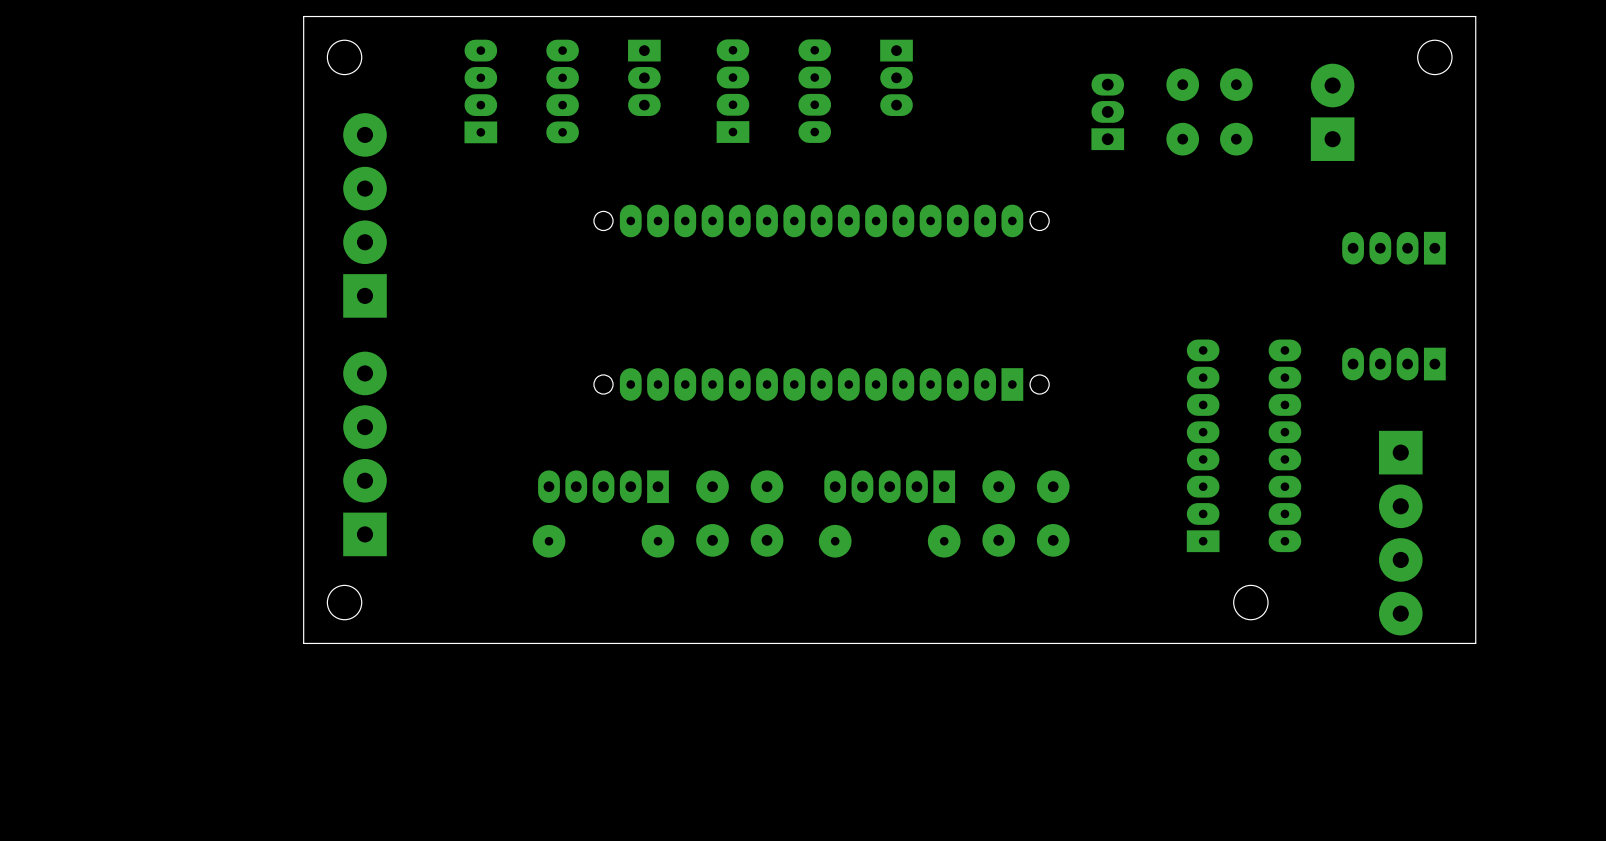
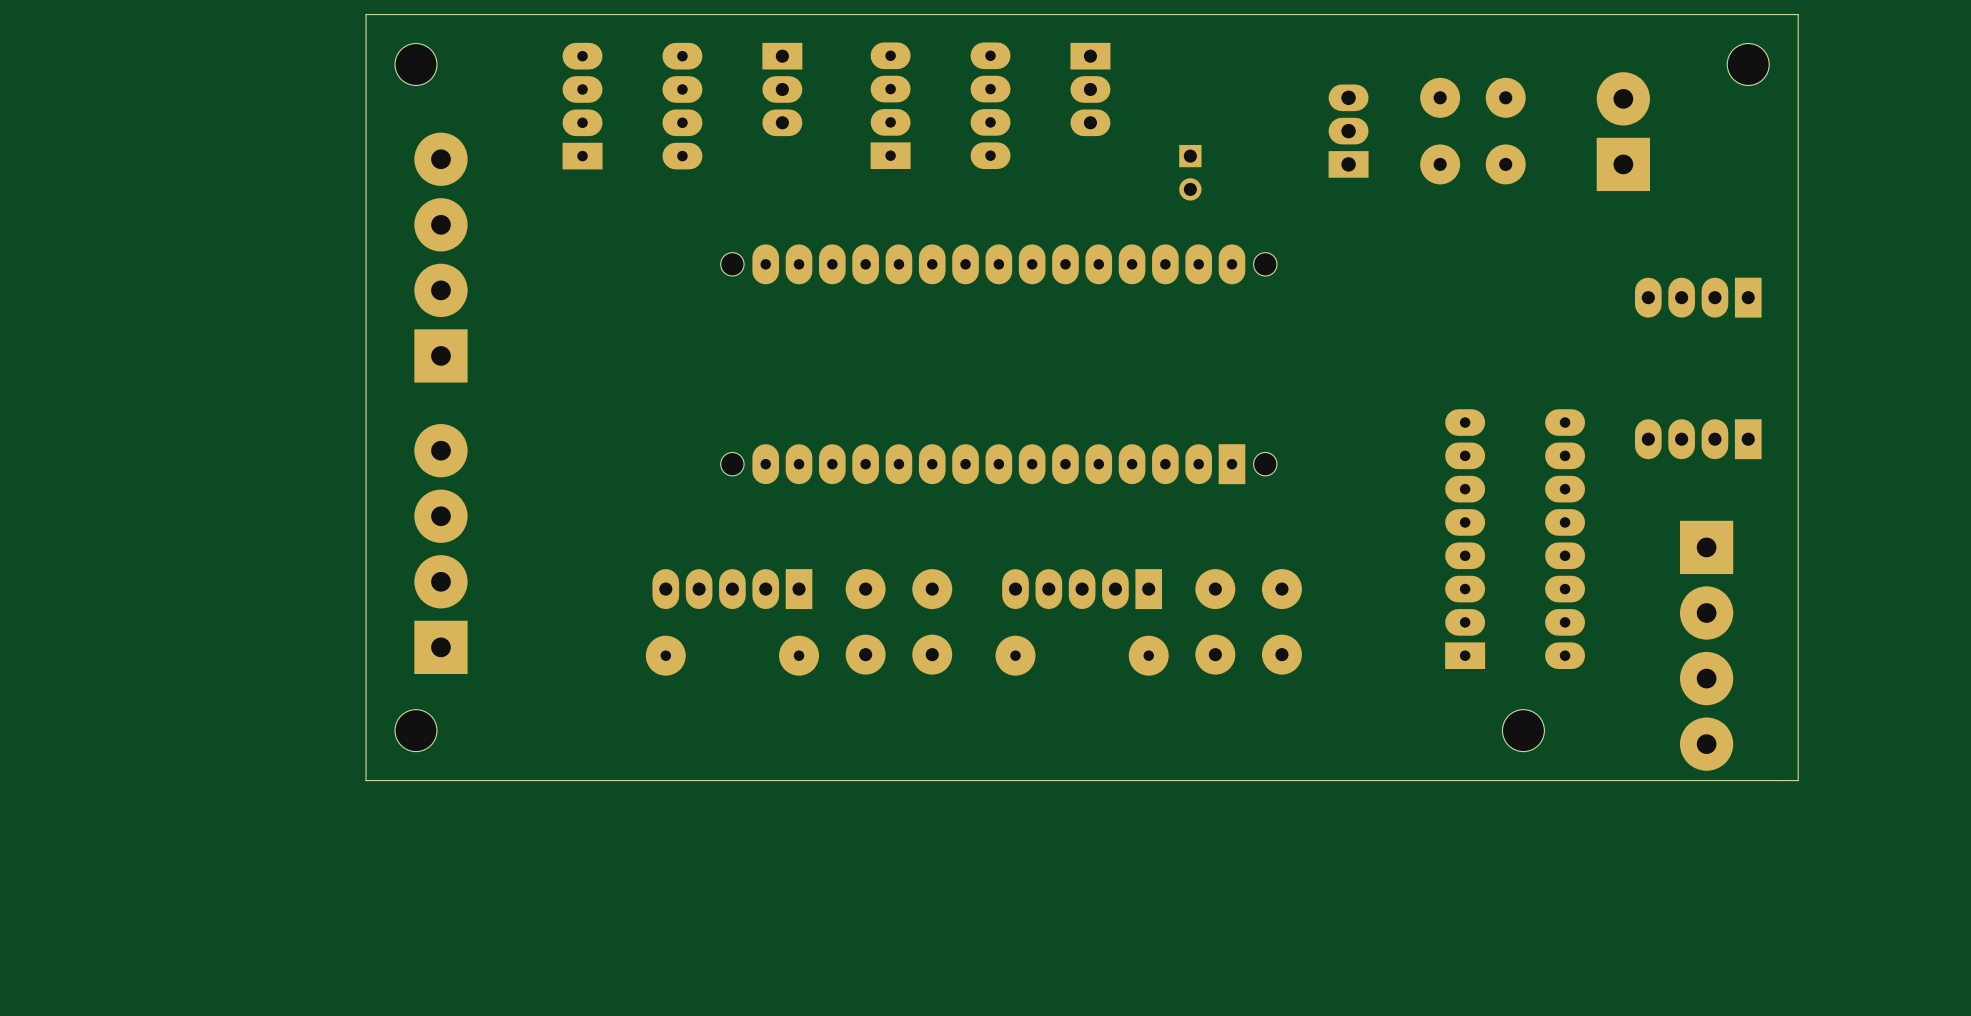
part: none -> (1190, 172)

